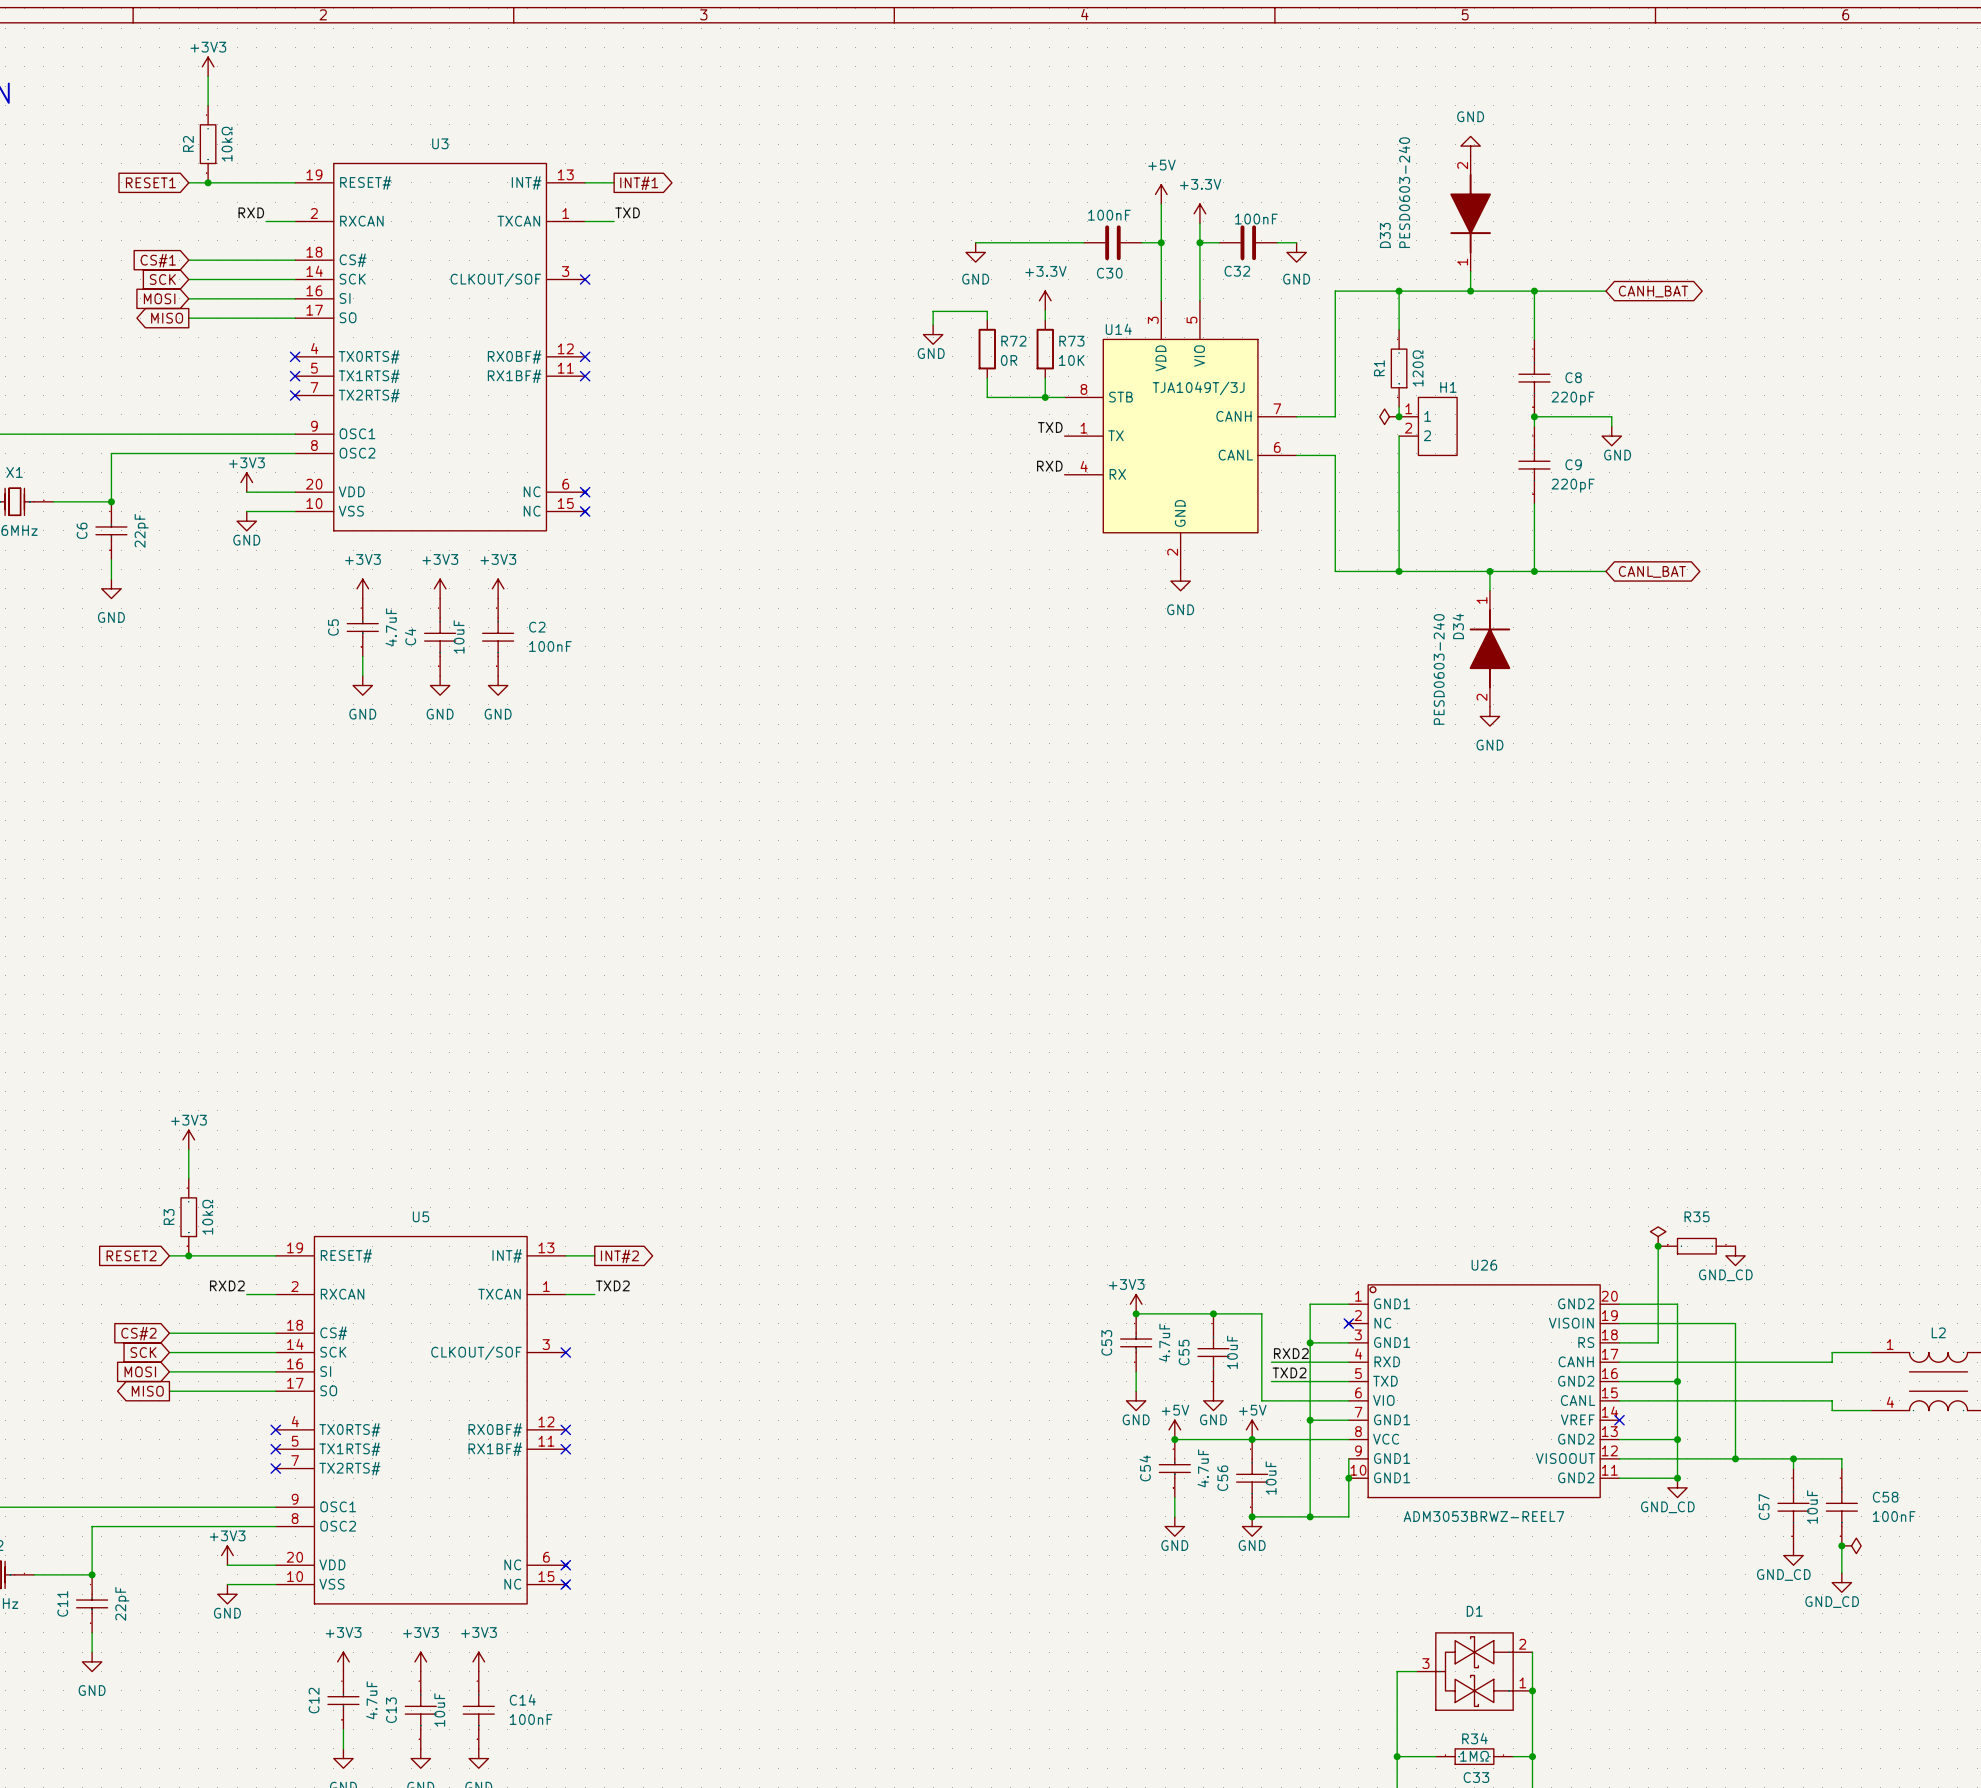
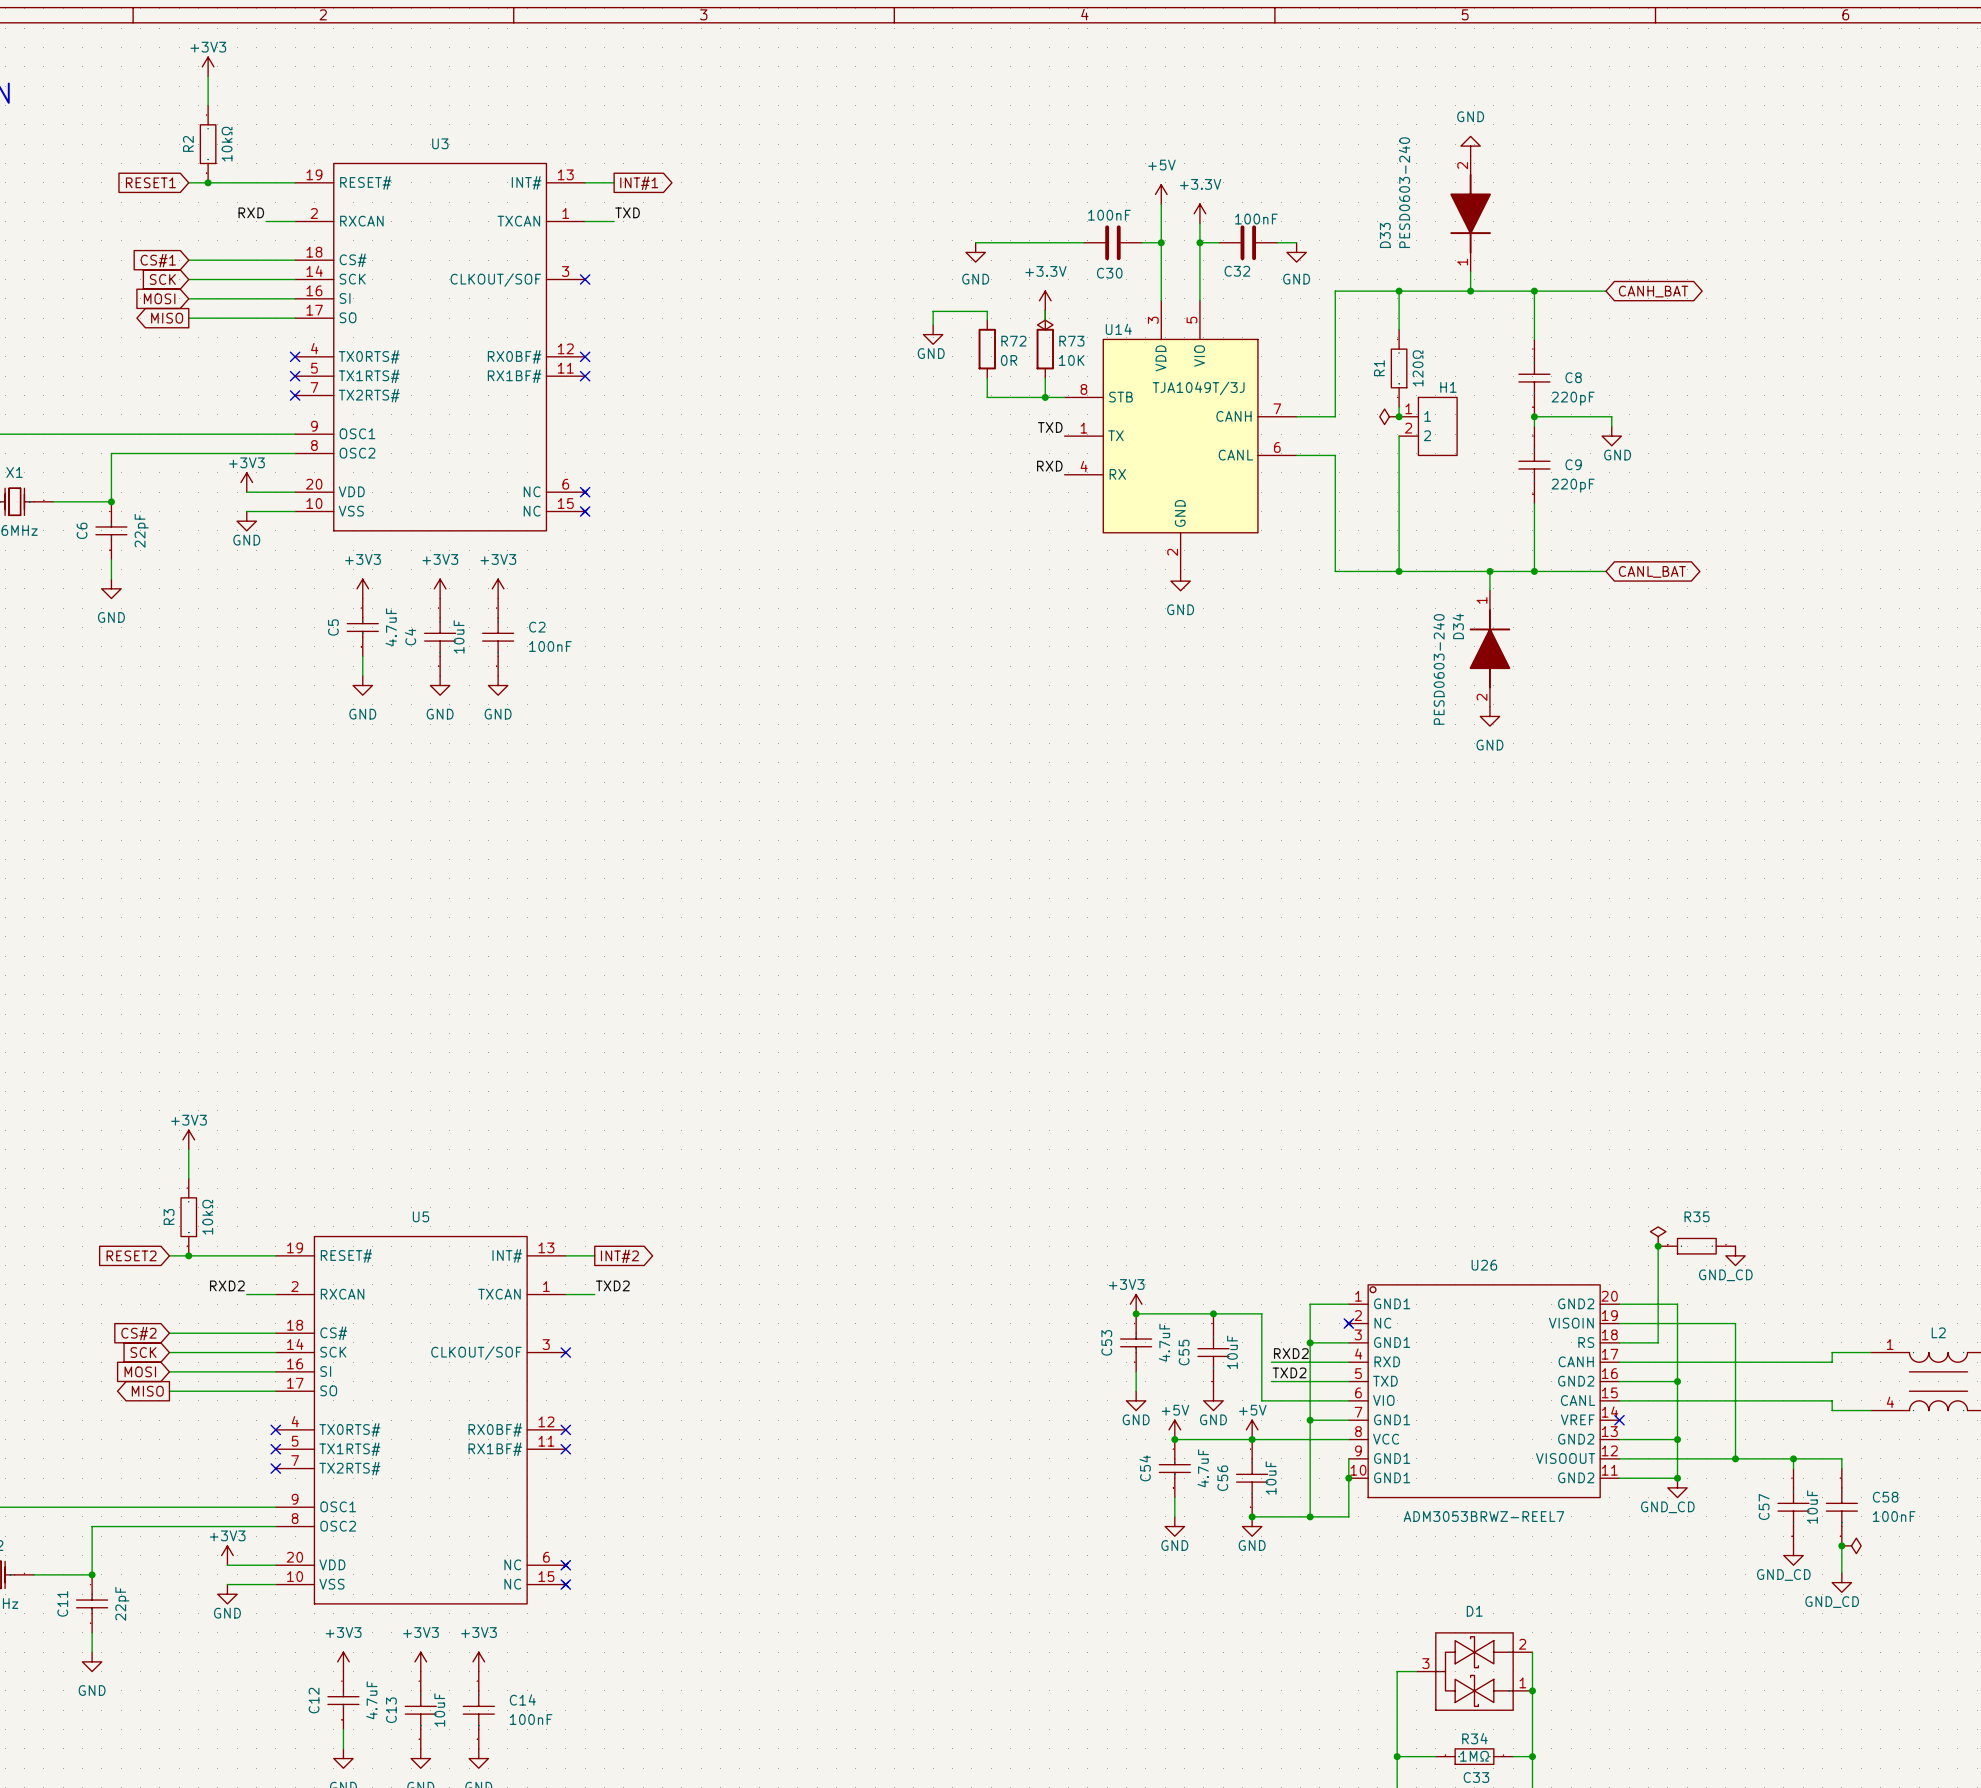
power symbol: none -> (1045, 320)

